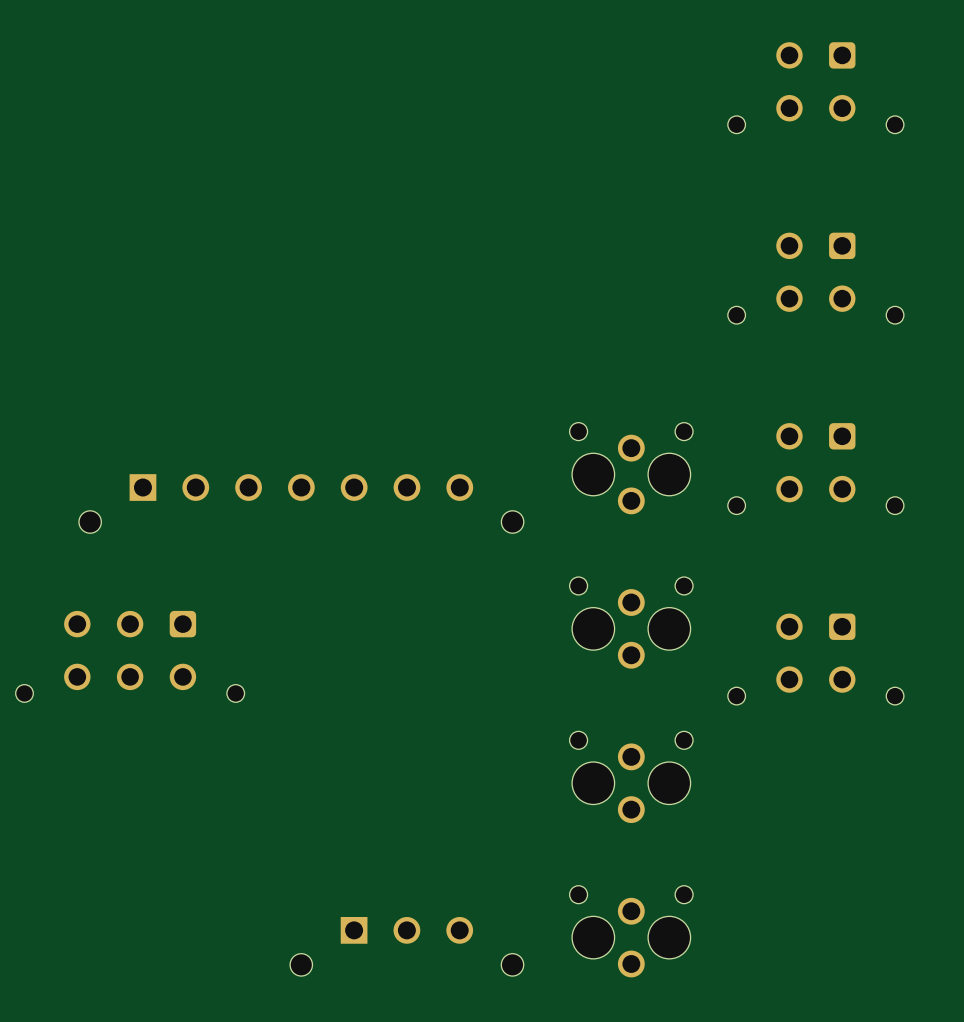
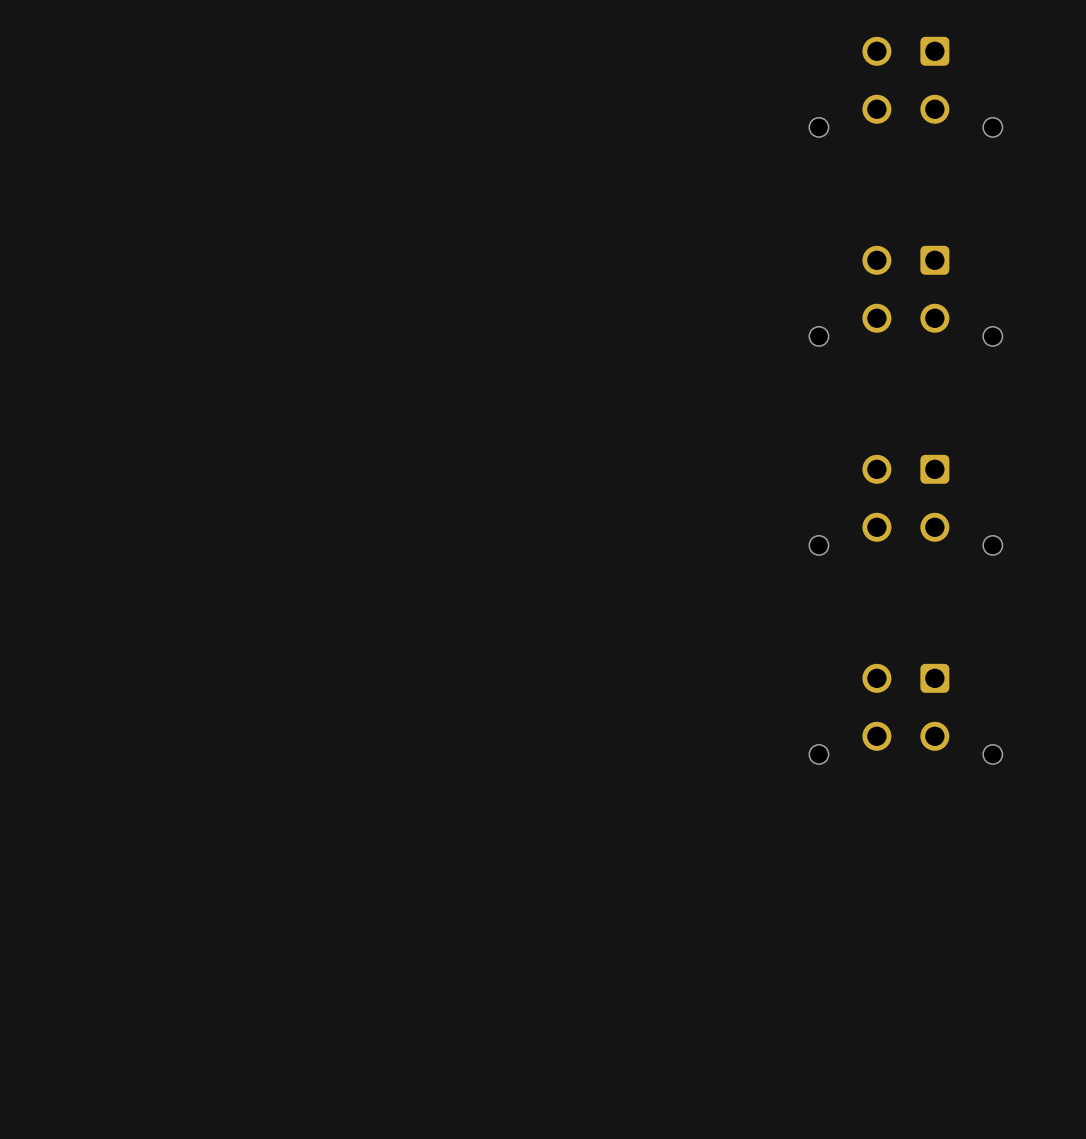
part: (631, 468) -> none
part: (301, 503) -> none
part: (631, 622) -> none
part: (130, 656) -> none
part: (631, 777) -> none
part: (631, 931) -> none
part: (406, 946) -> none

